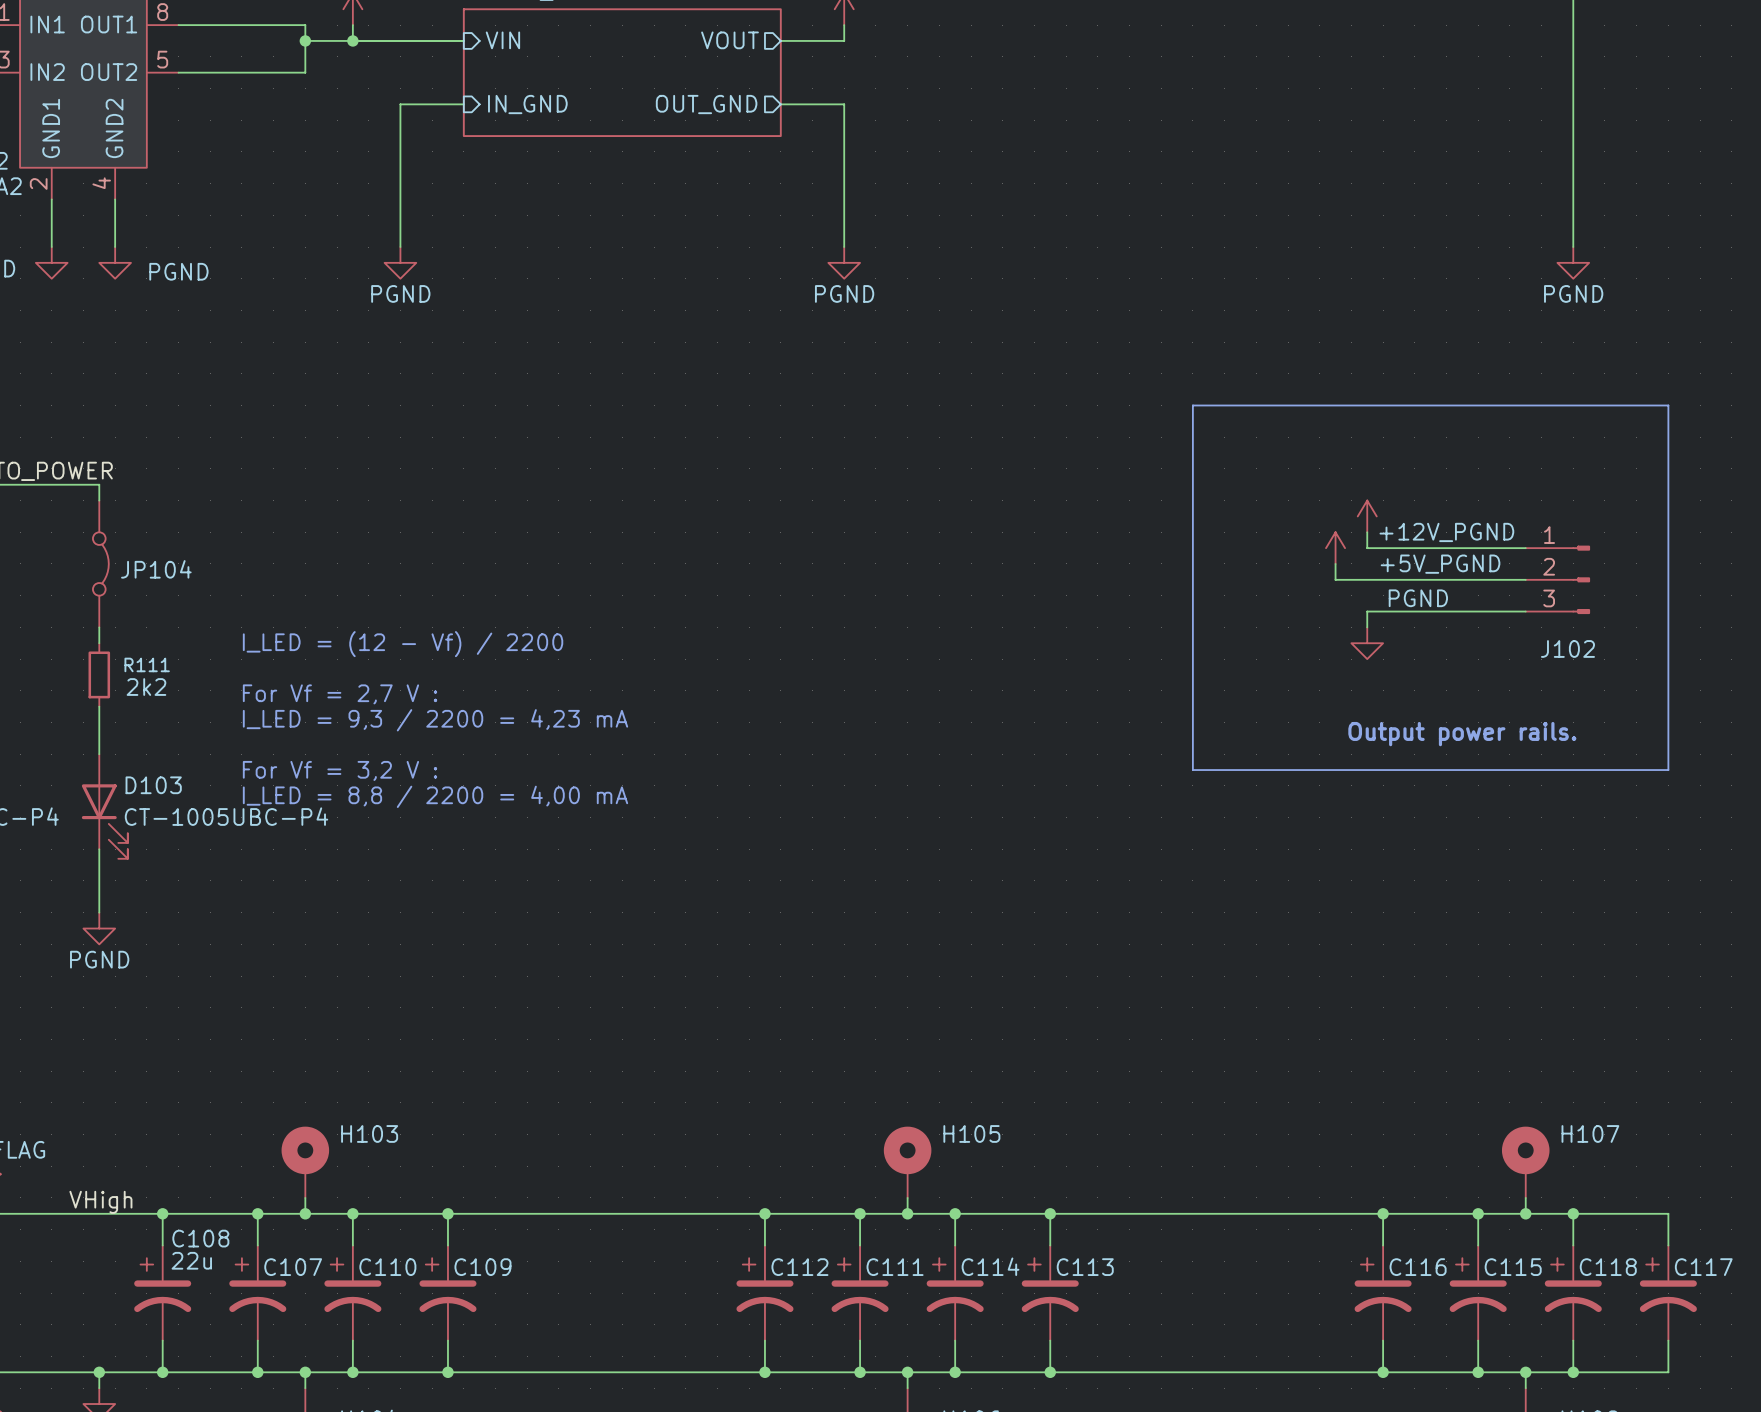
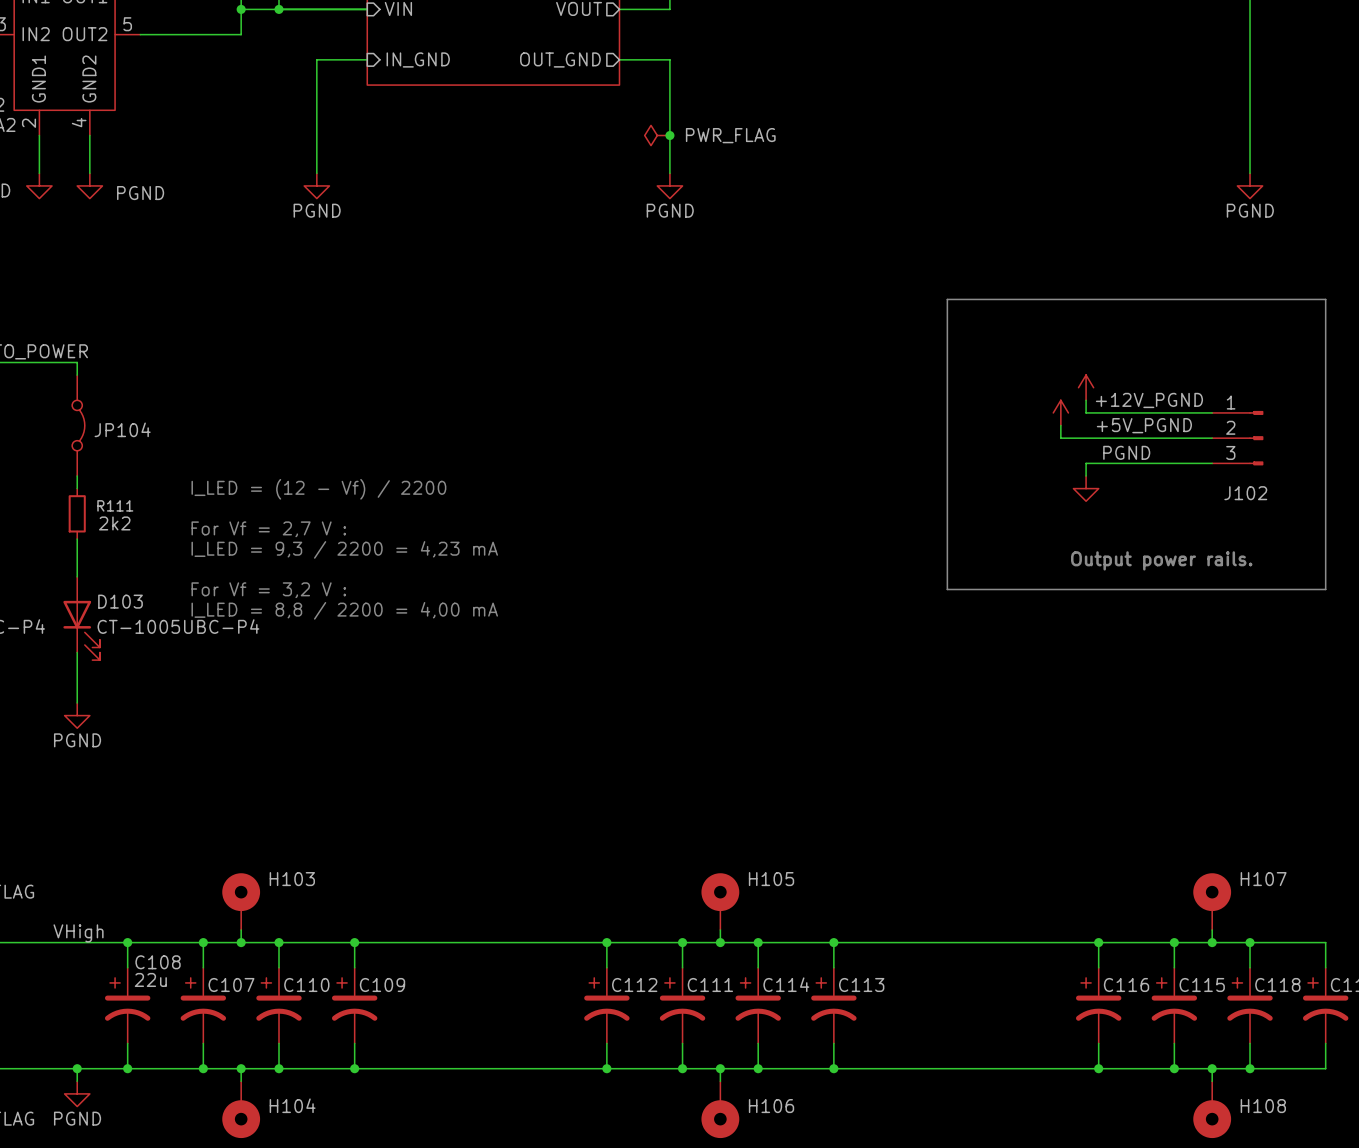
power symbol: none -> PWR_FLAG (657, 135)
junction: none -> (669, 135)

